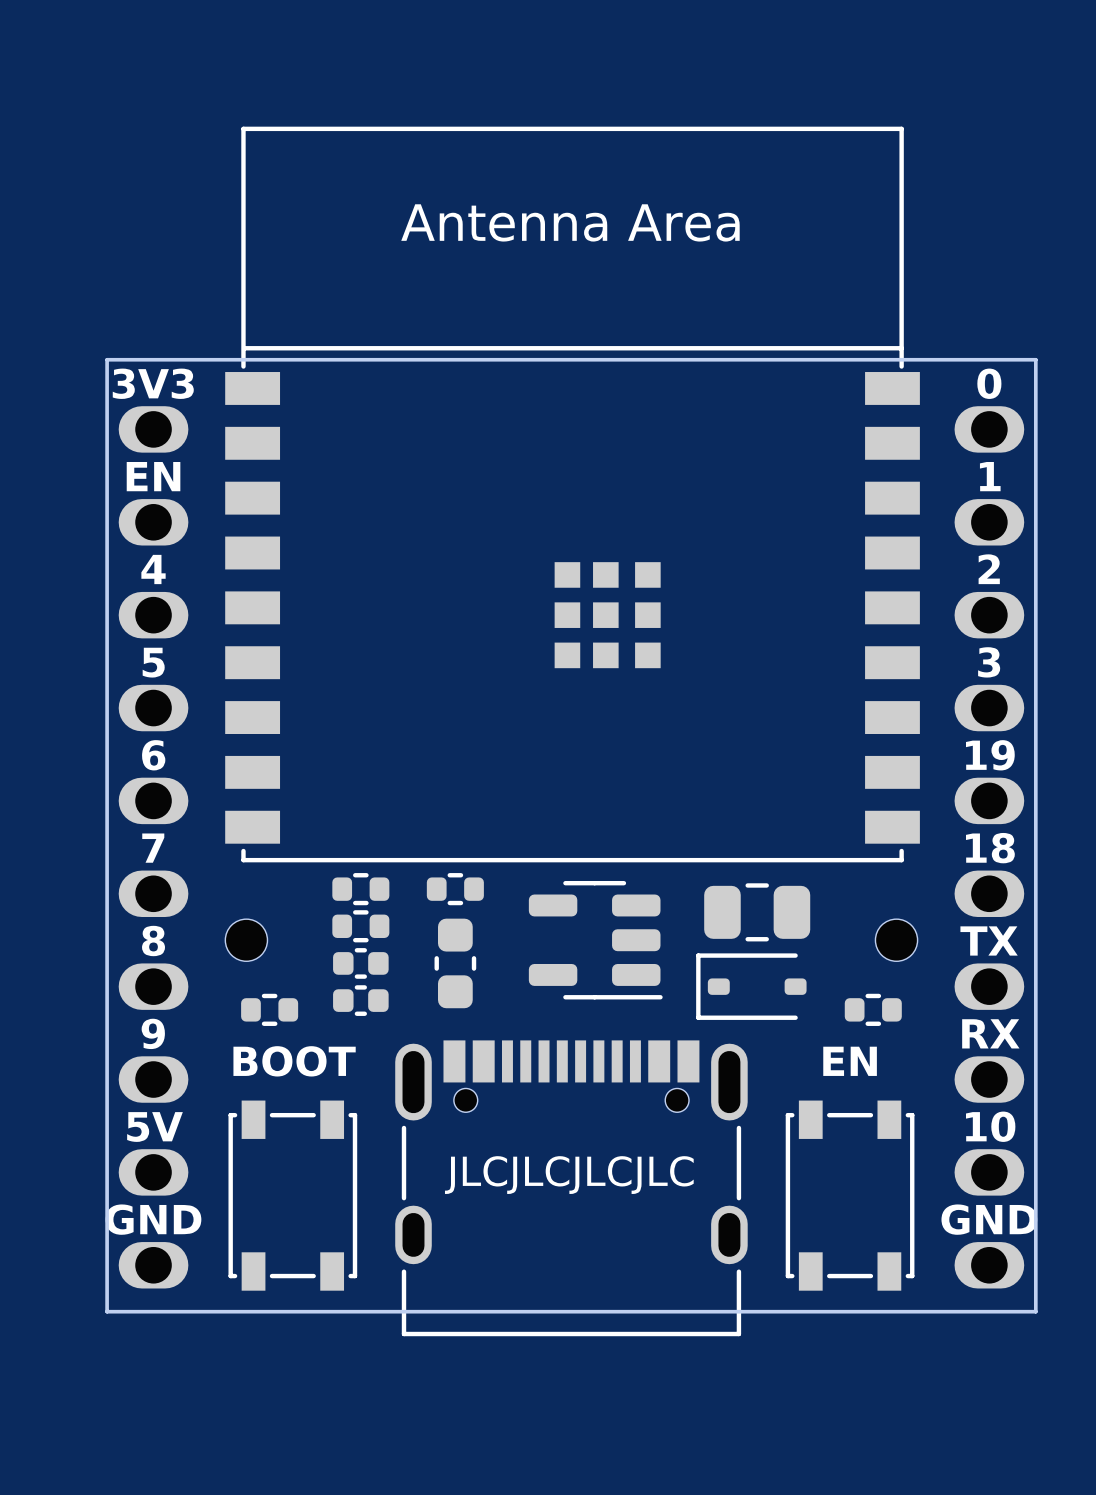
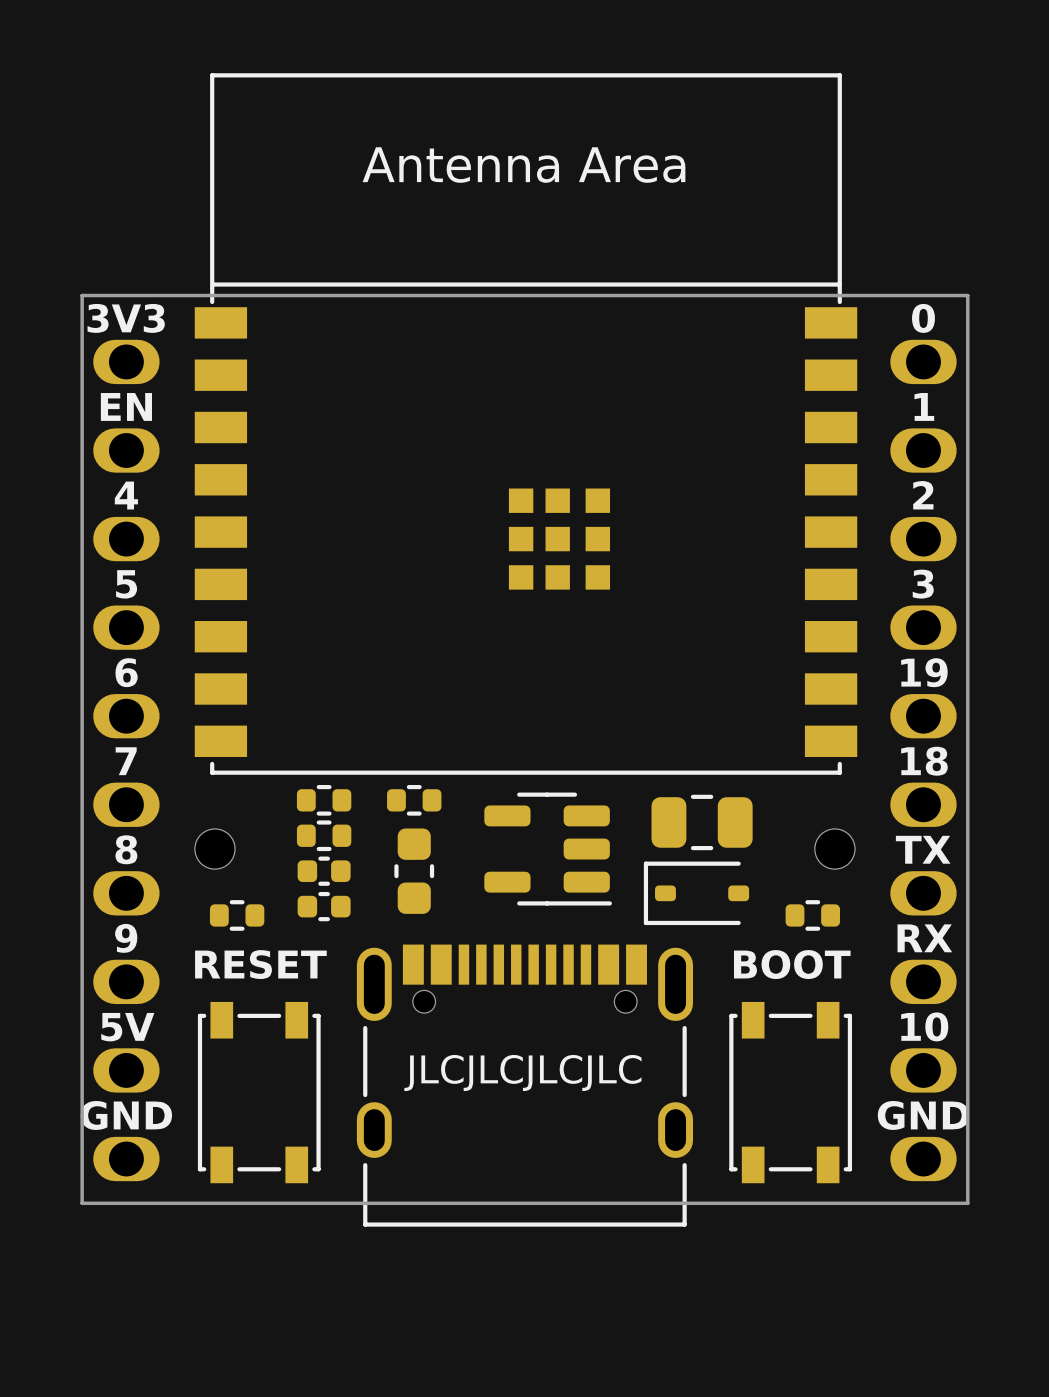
text: BOOT (294, 1061) -> RESET (260, 964)
text: EN (850, 1061) -> BOOT (792, 964)

